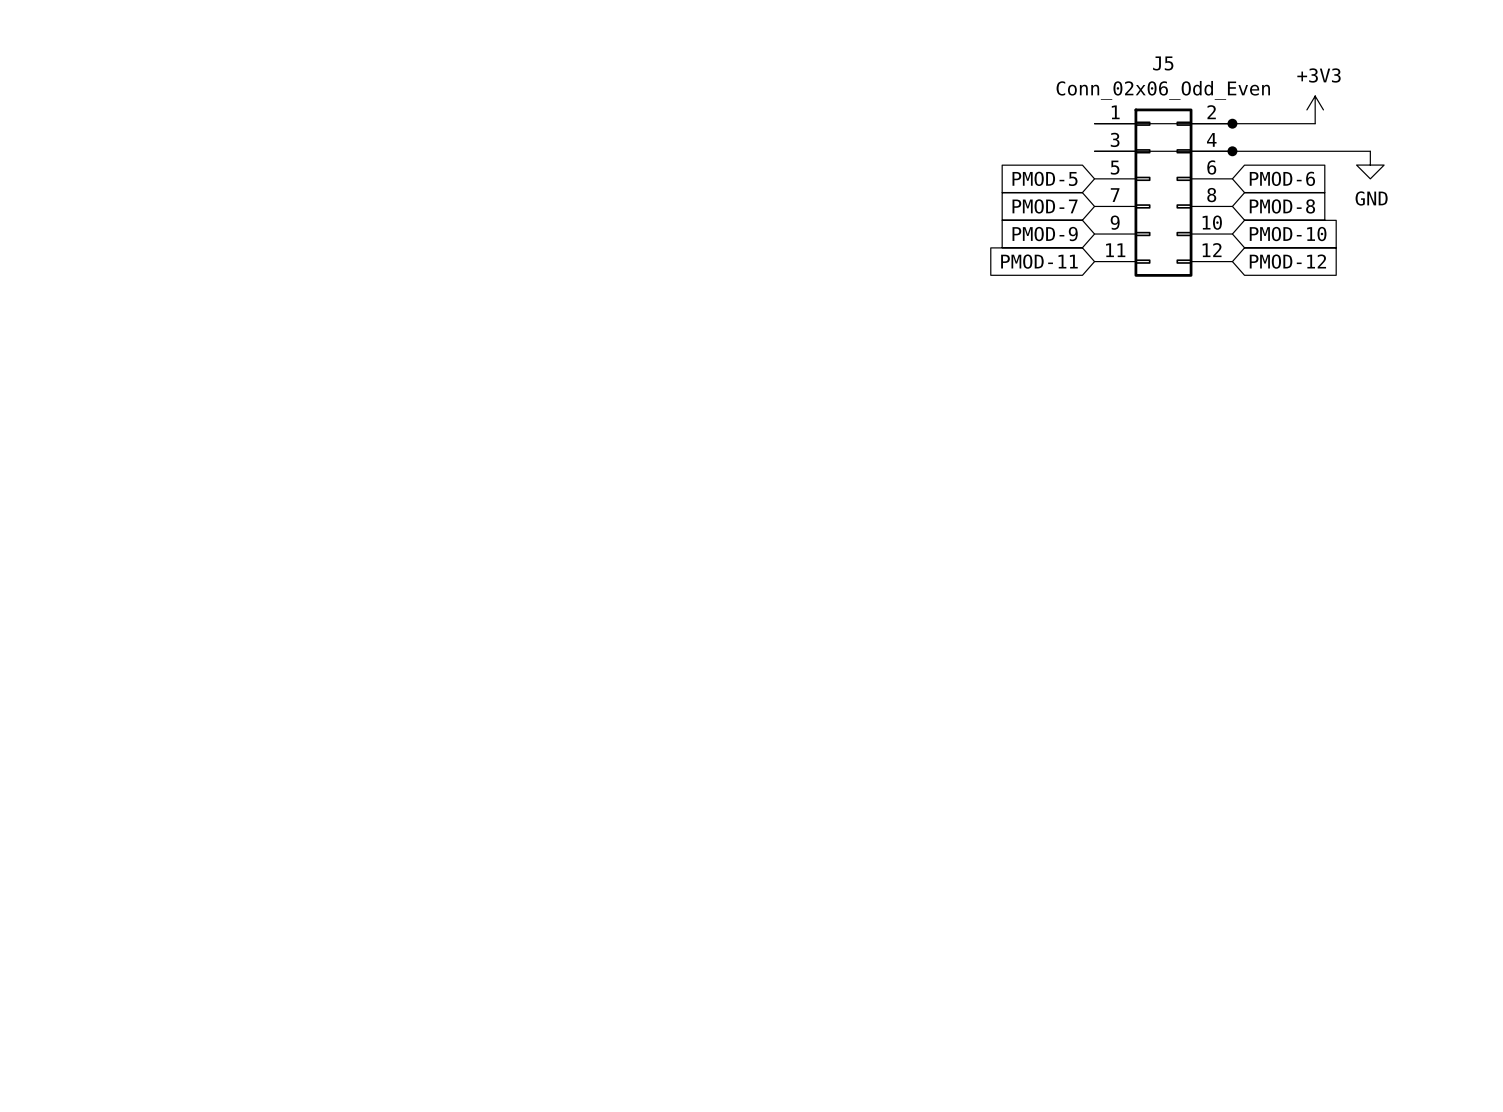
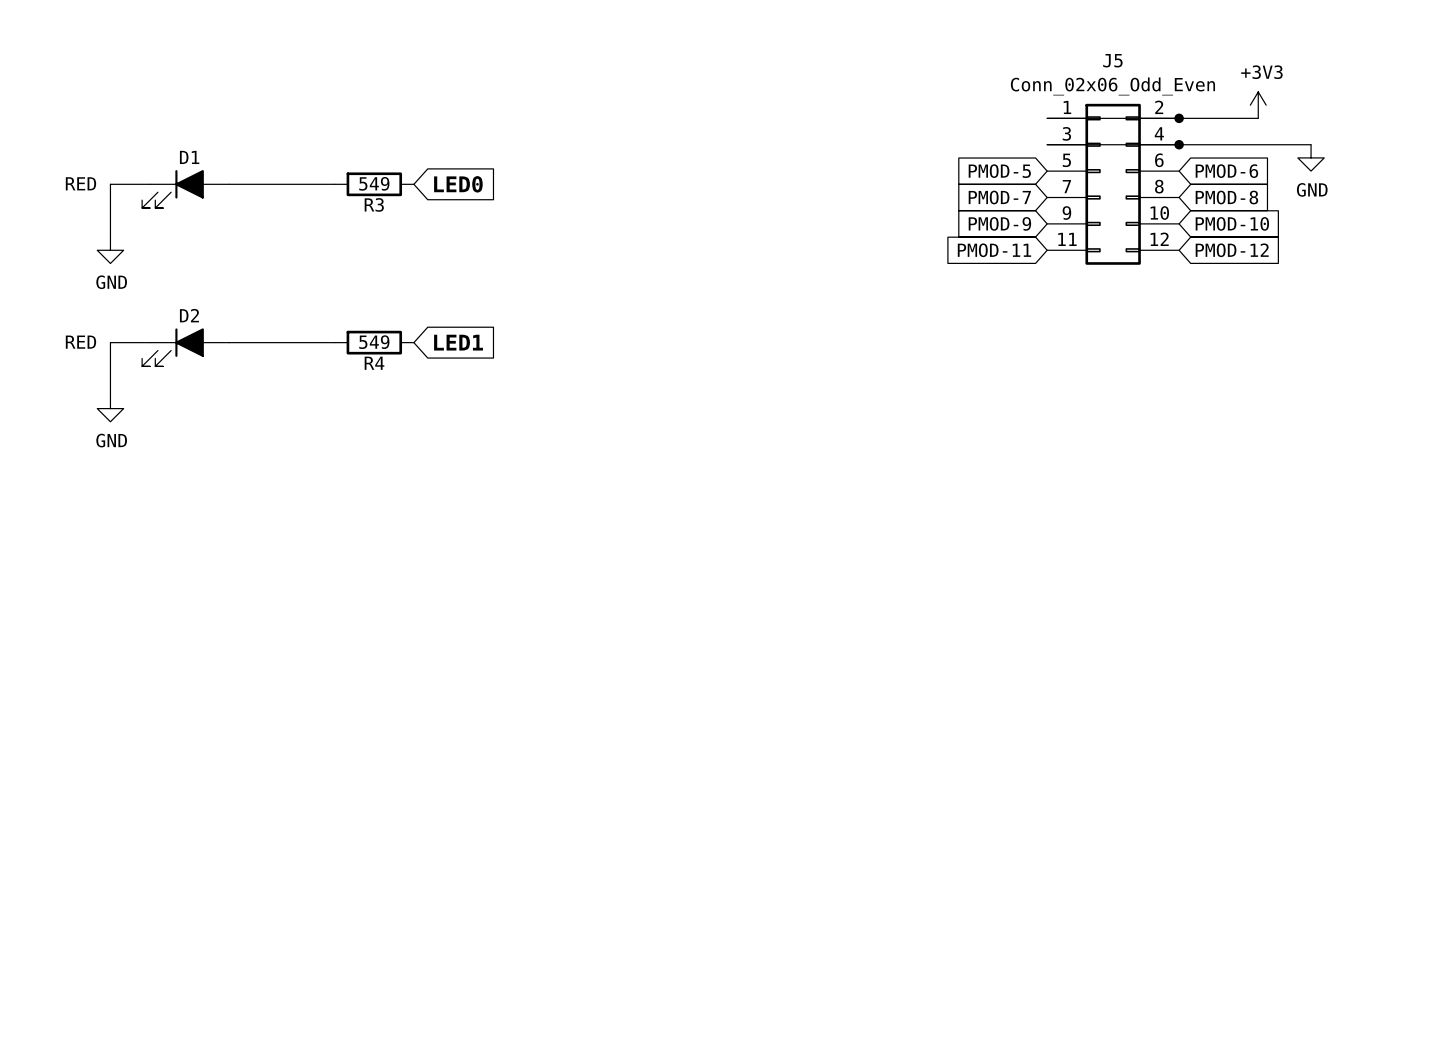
wire: none -> (150, 184) (110, 184) (110, 237)
wire: none -> (229, 184) (334, 184)
R3: none -> 549 (374, 184)
global label: none -> LED0 (458, 184)
D1: none -> RED (185, 189)
power symbol: none -> GND (110, 250)
wire: none -> (150, 342) (110, 342) (110, 395)
wire: none -> (229, 342) (334, 342)
R4: none -> 549 (374, 342)
global label: none -> LED1 (458, 342)
D2: none -> RED (185, 347)
power symbol: none -> GND (110, 408)

